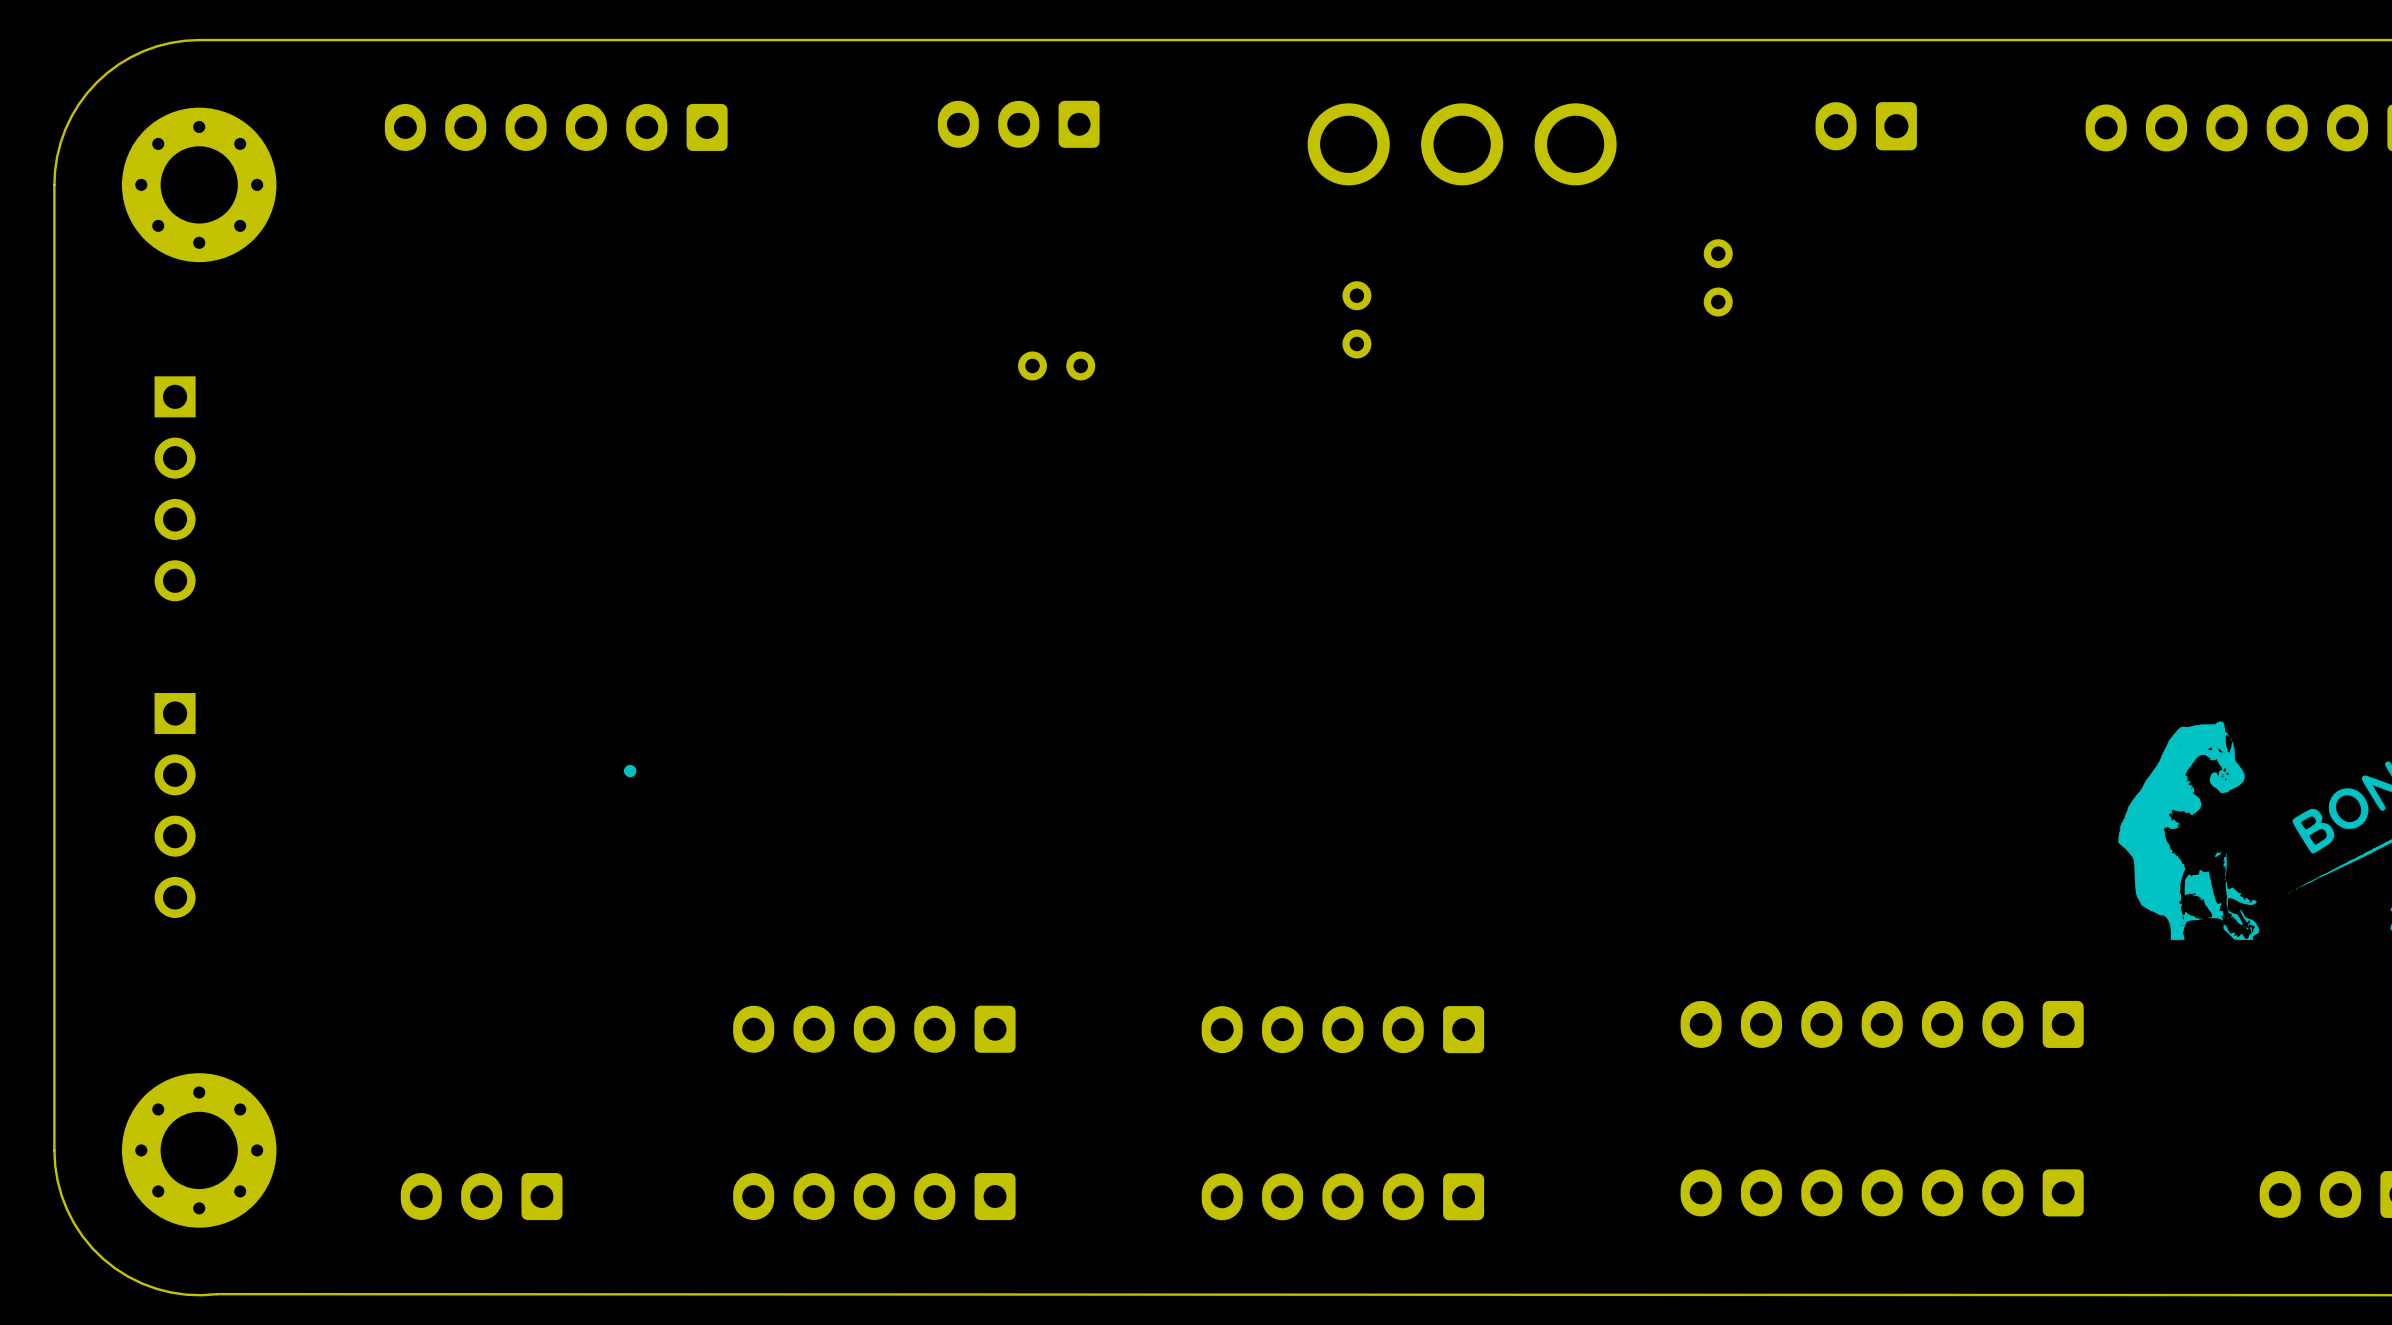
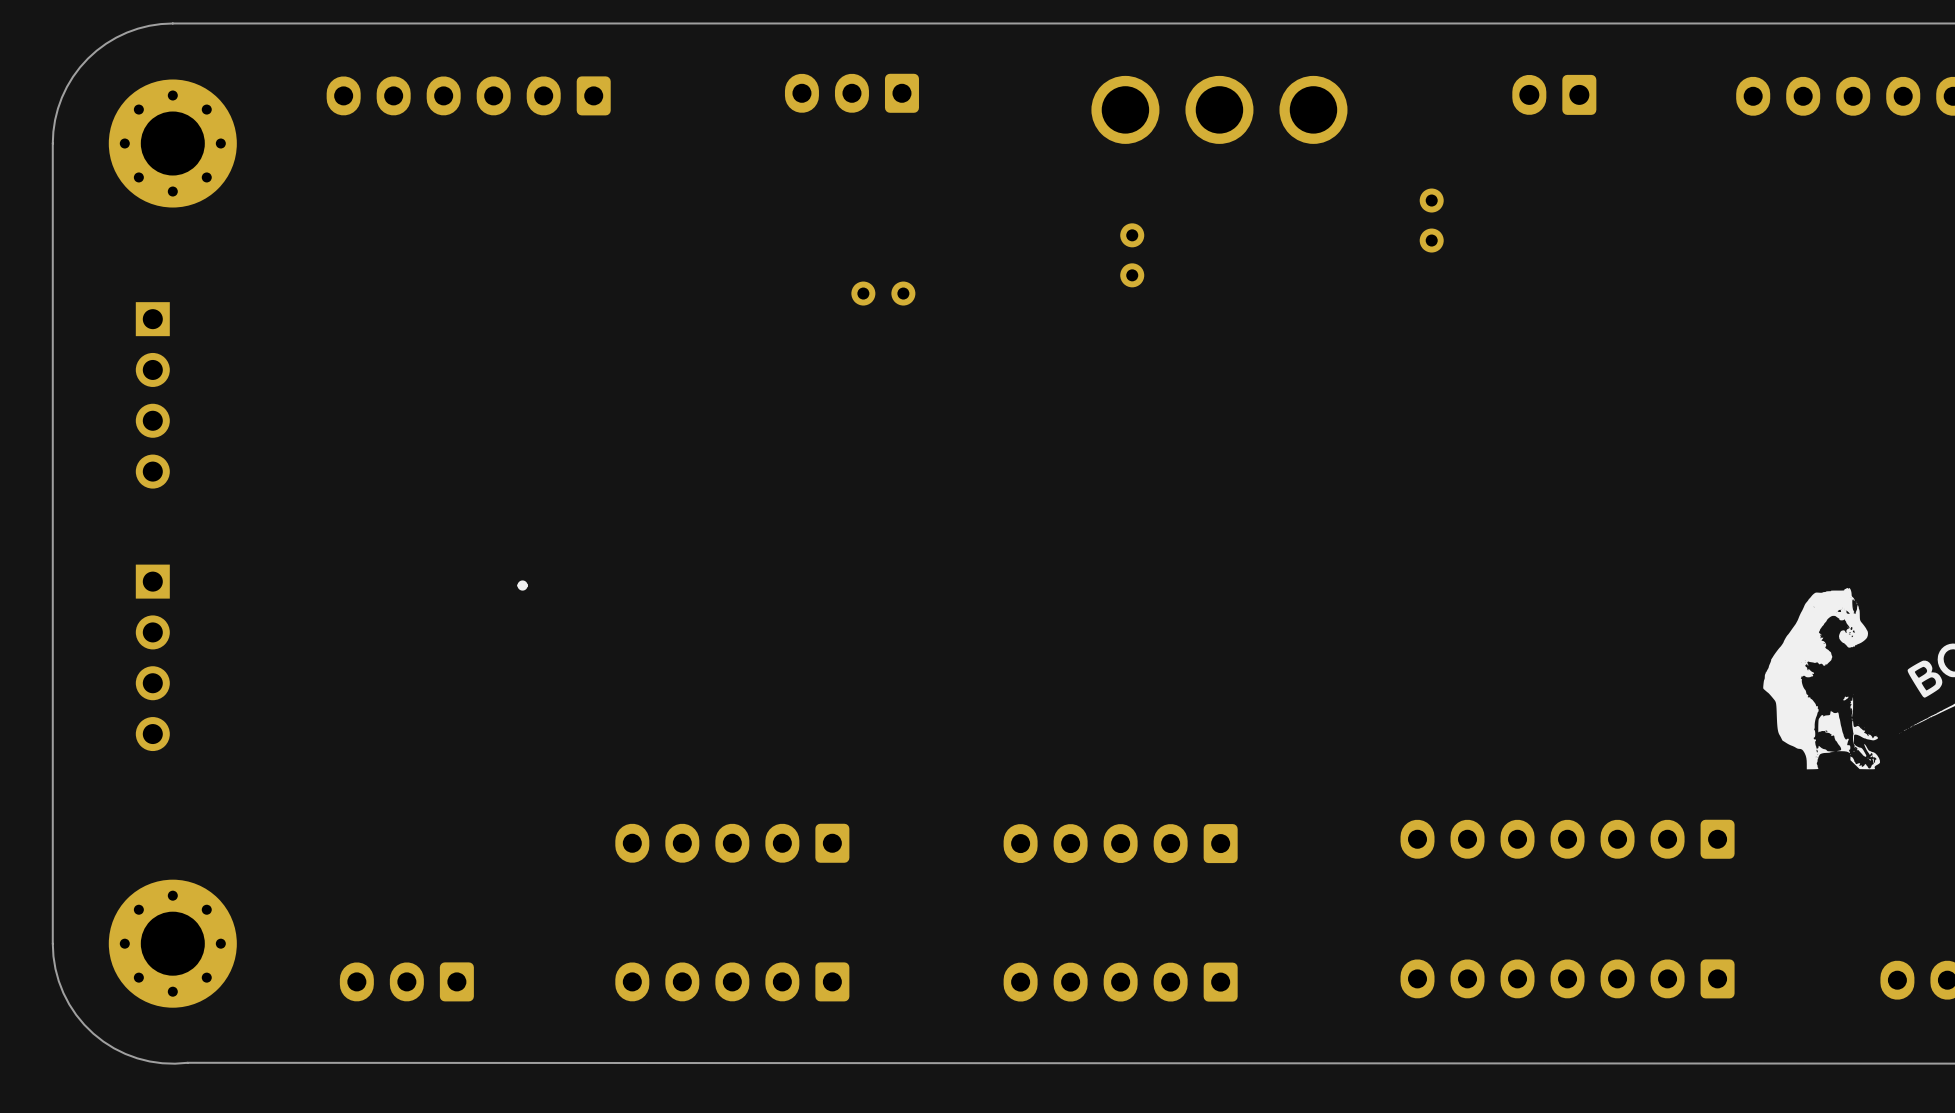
part position: (630, 771) -> (522, 585)

